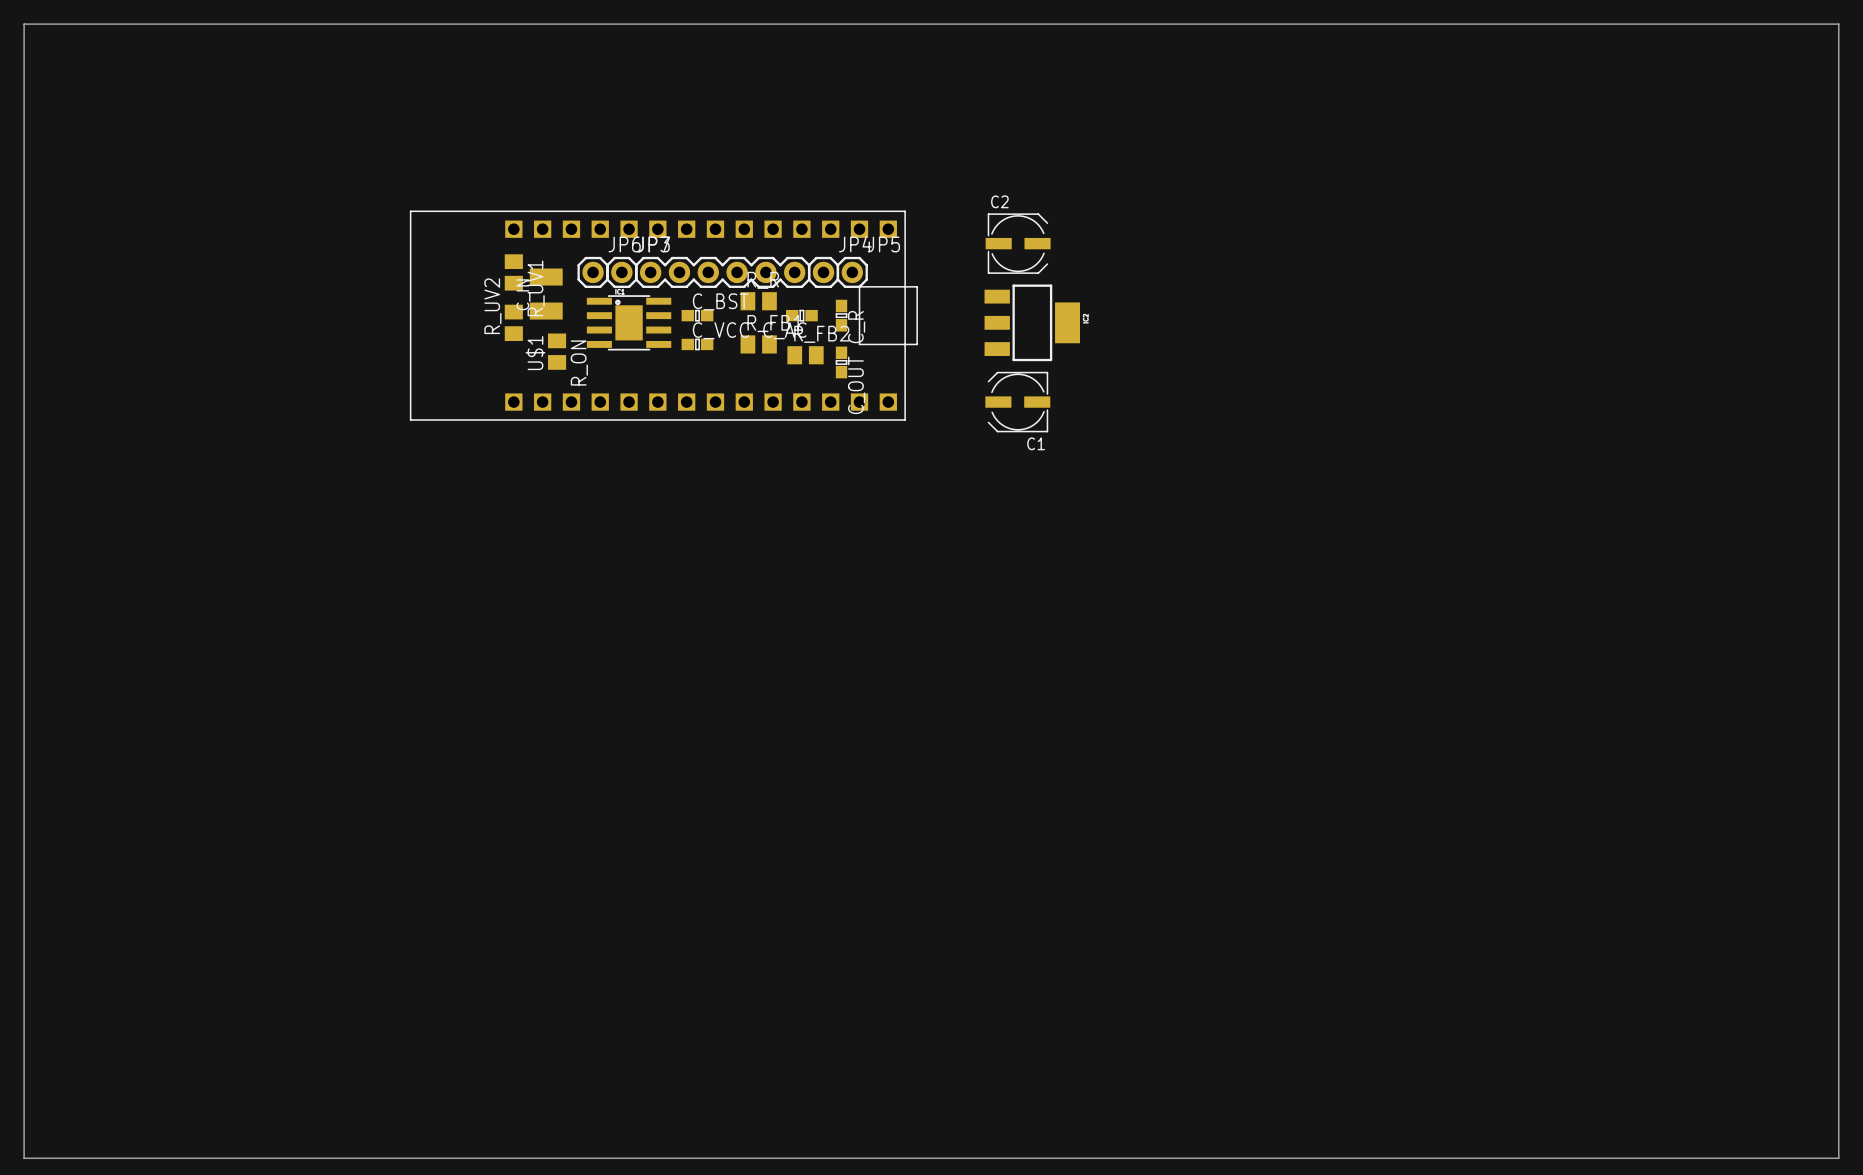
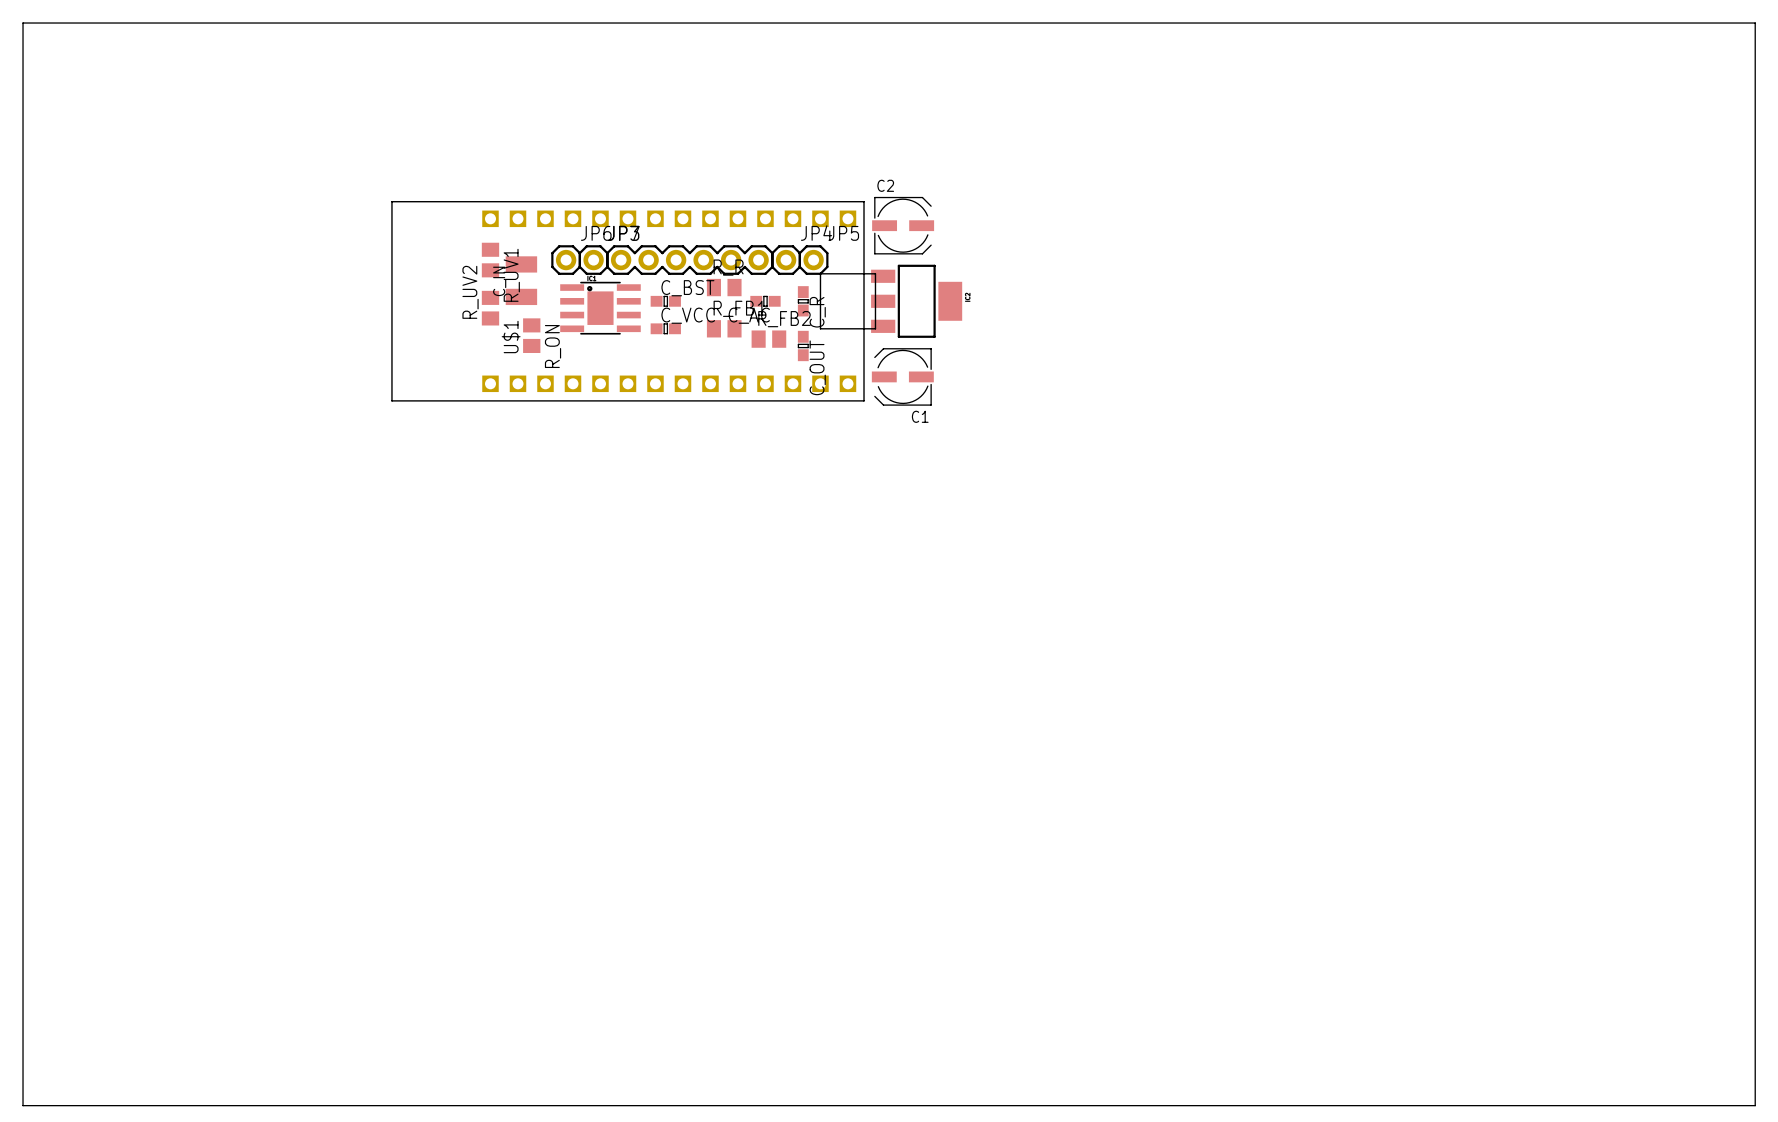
C2 position: (1018, 243) -> (903, 225)
part position: (1032, 322) -> (916, 301)
C1 position: (1017, 402) -> (902, 376)

